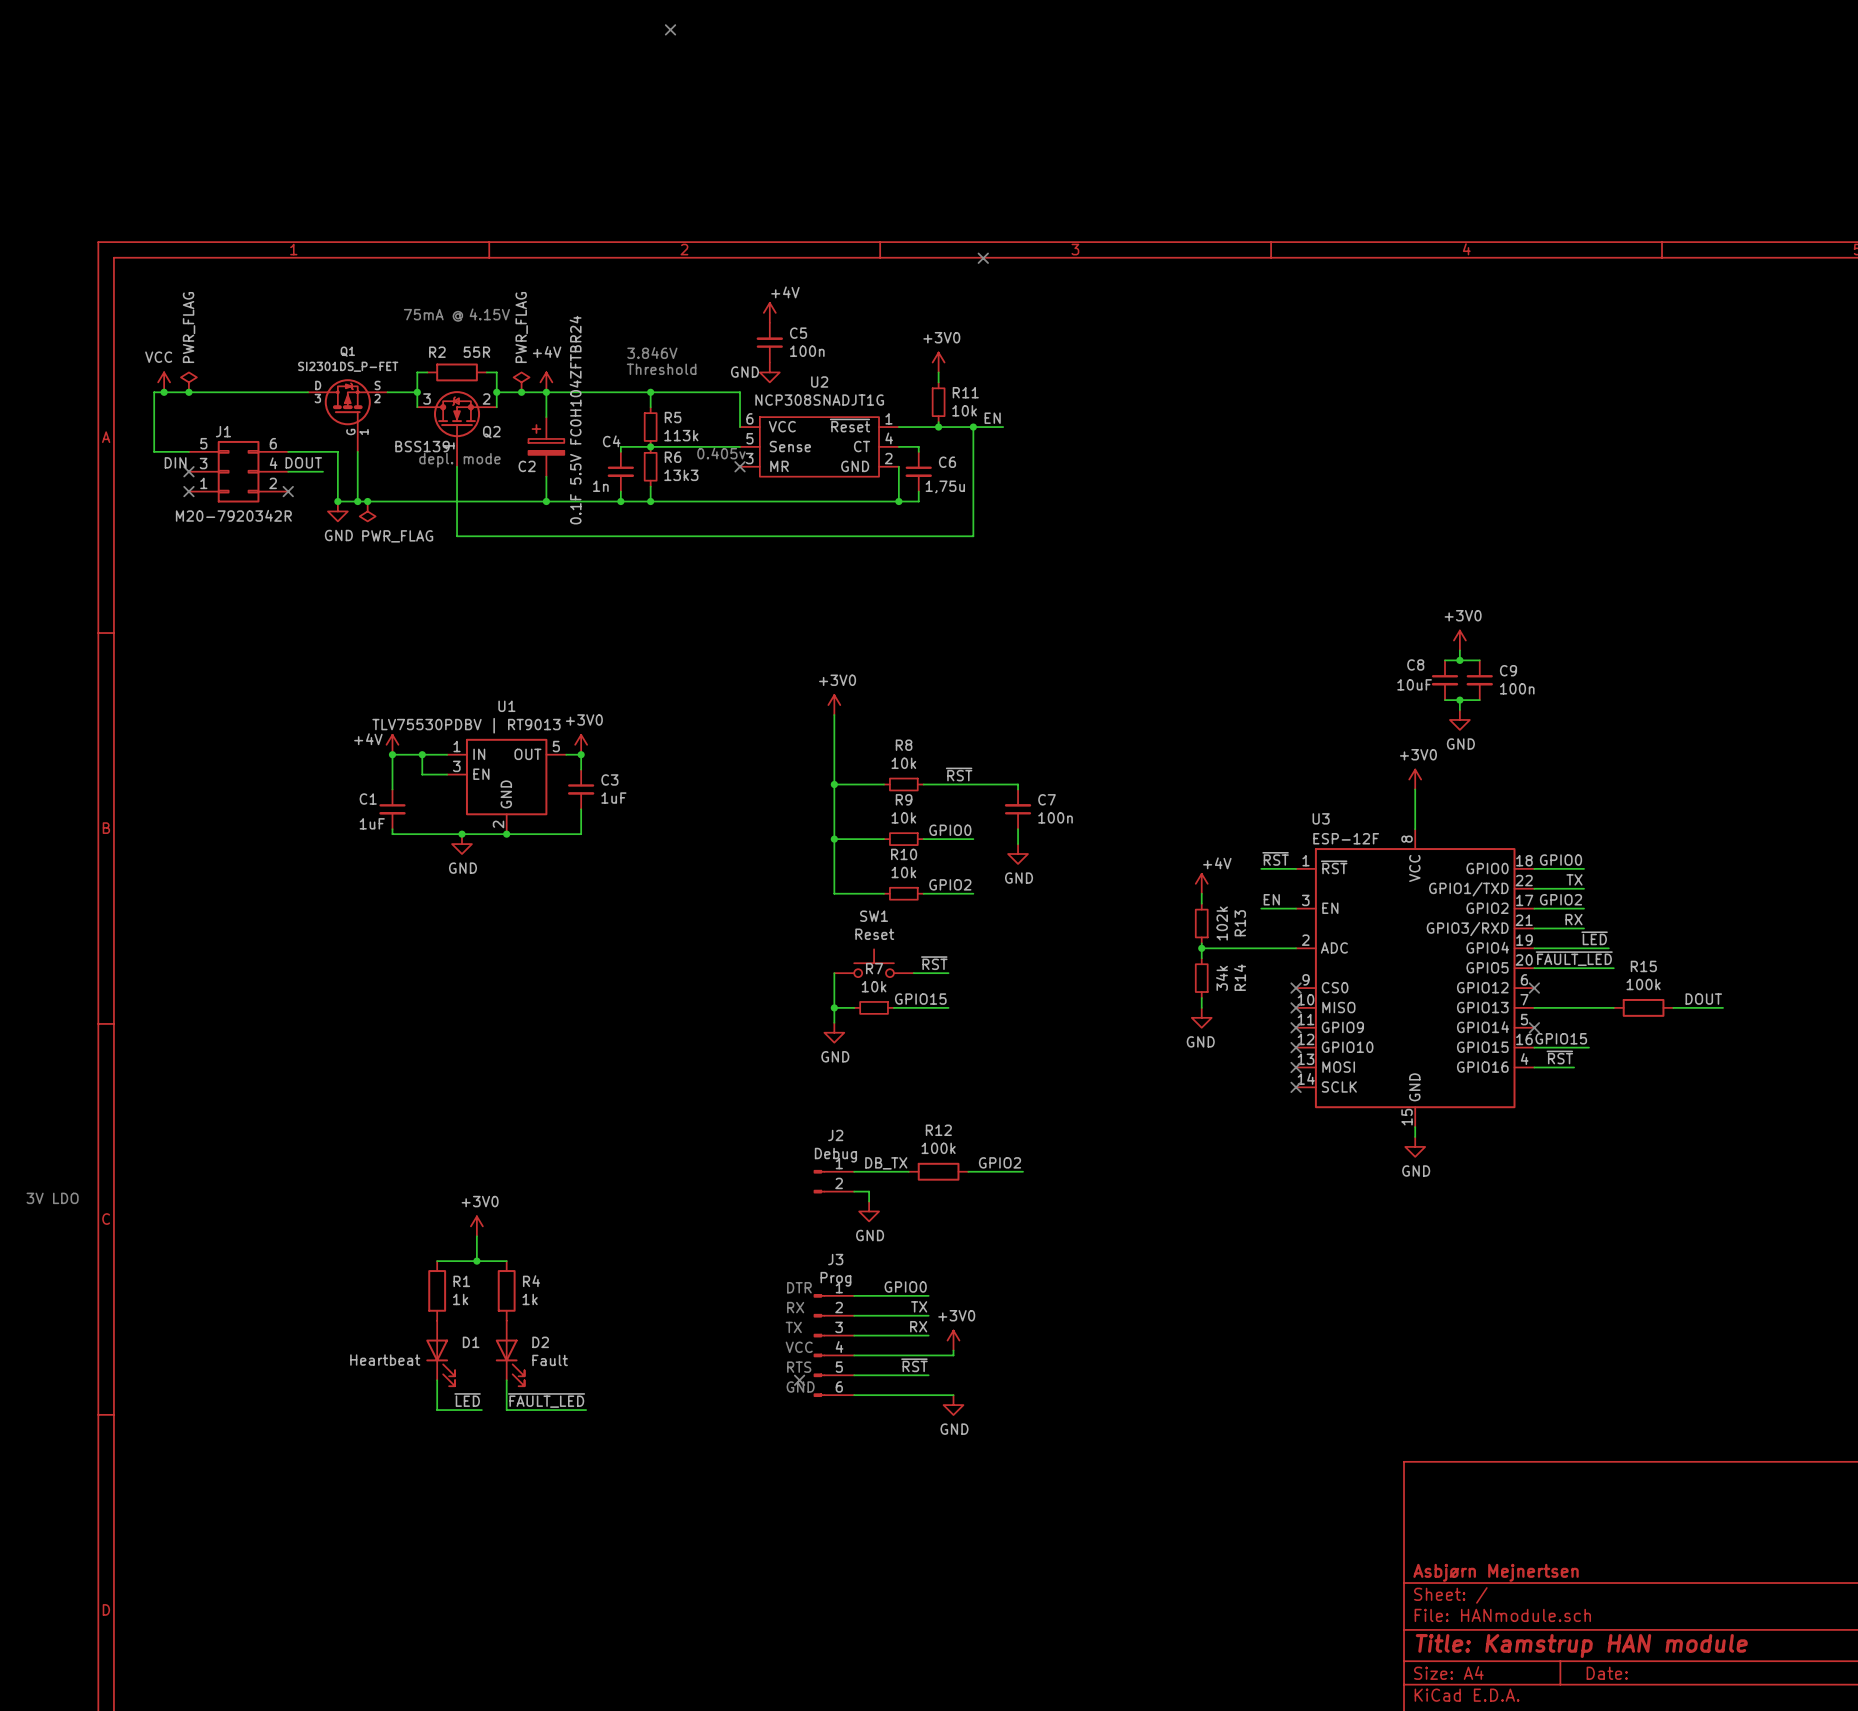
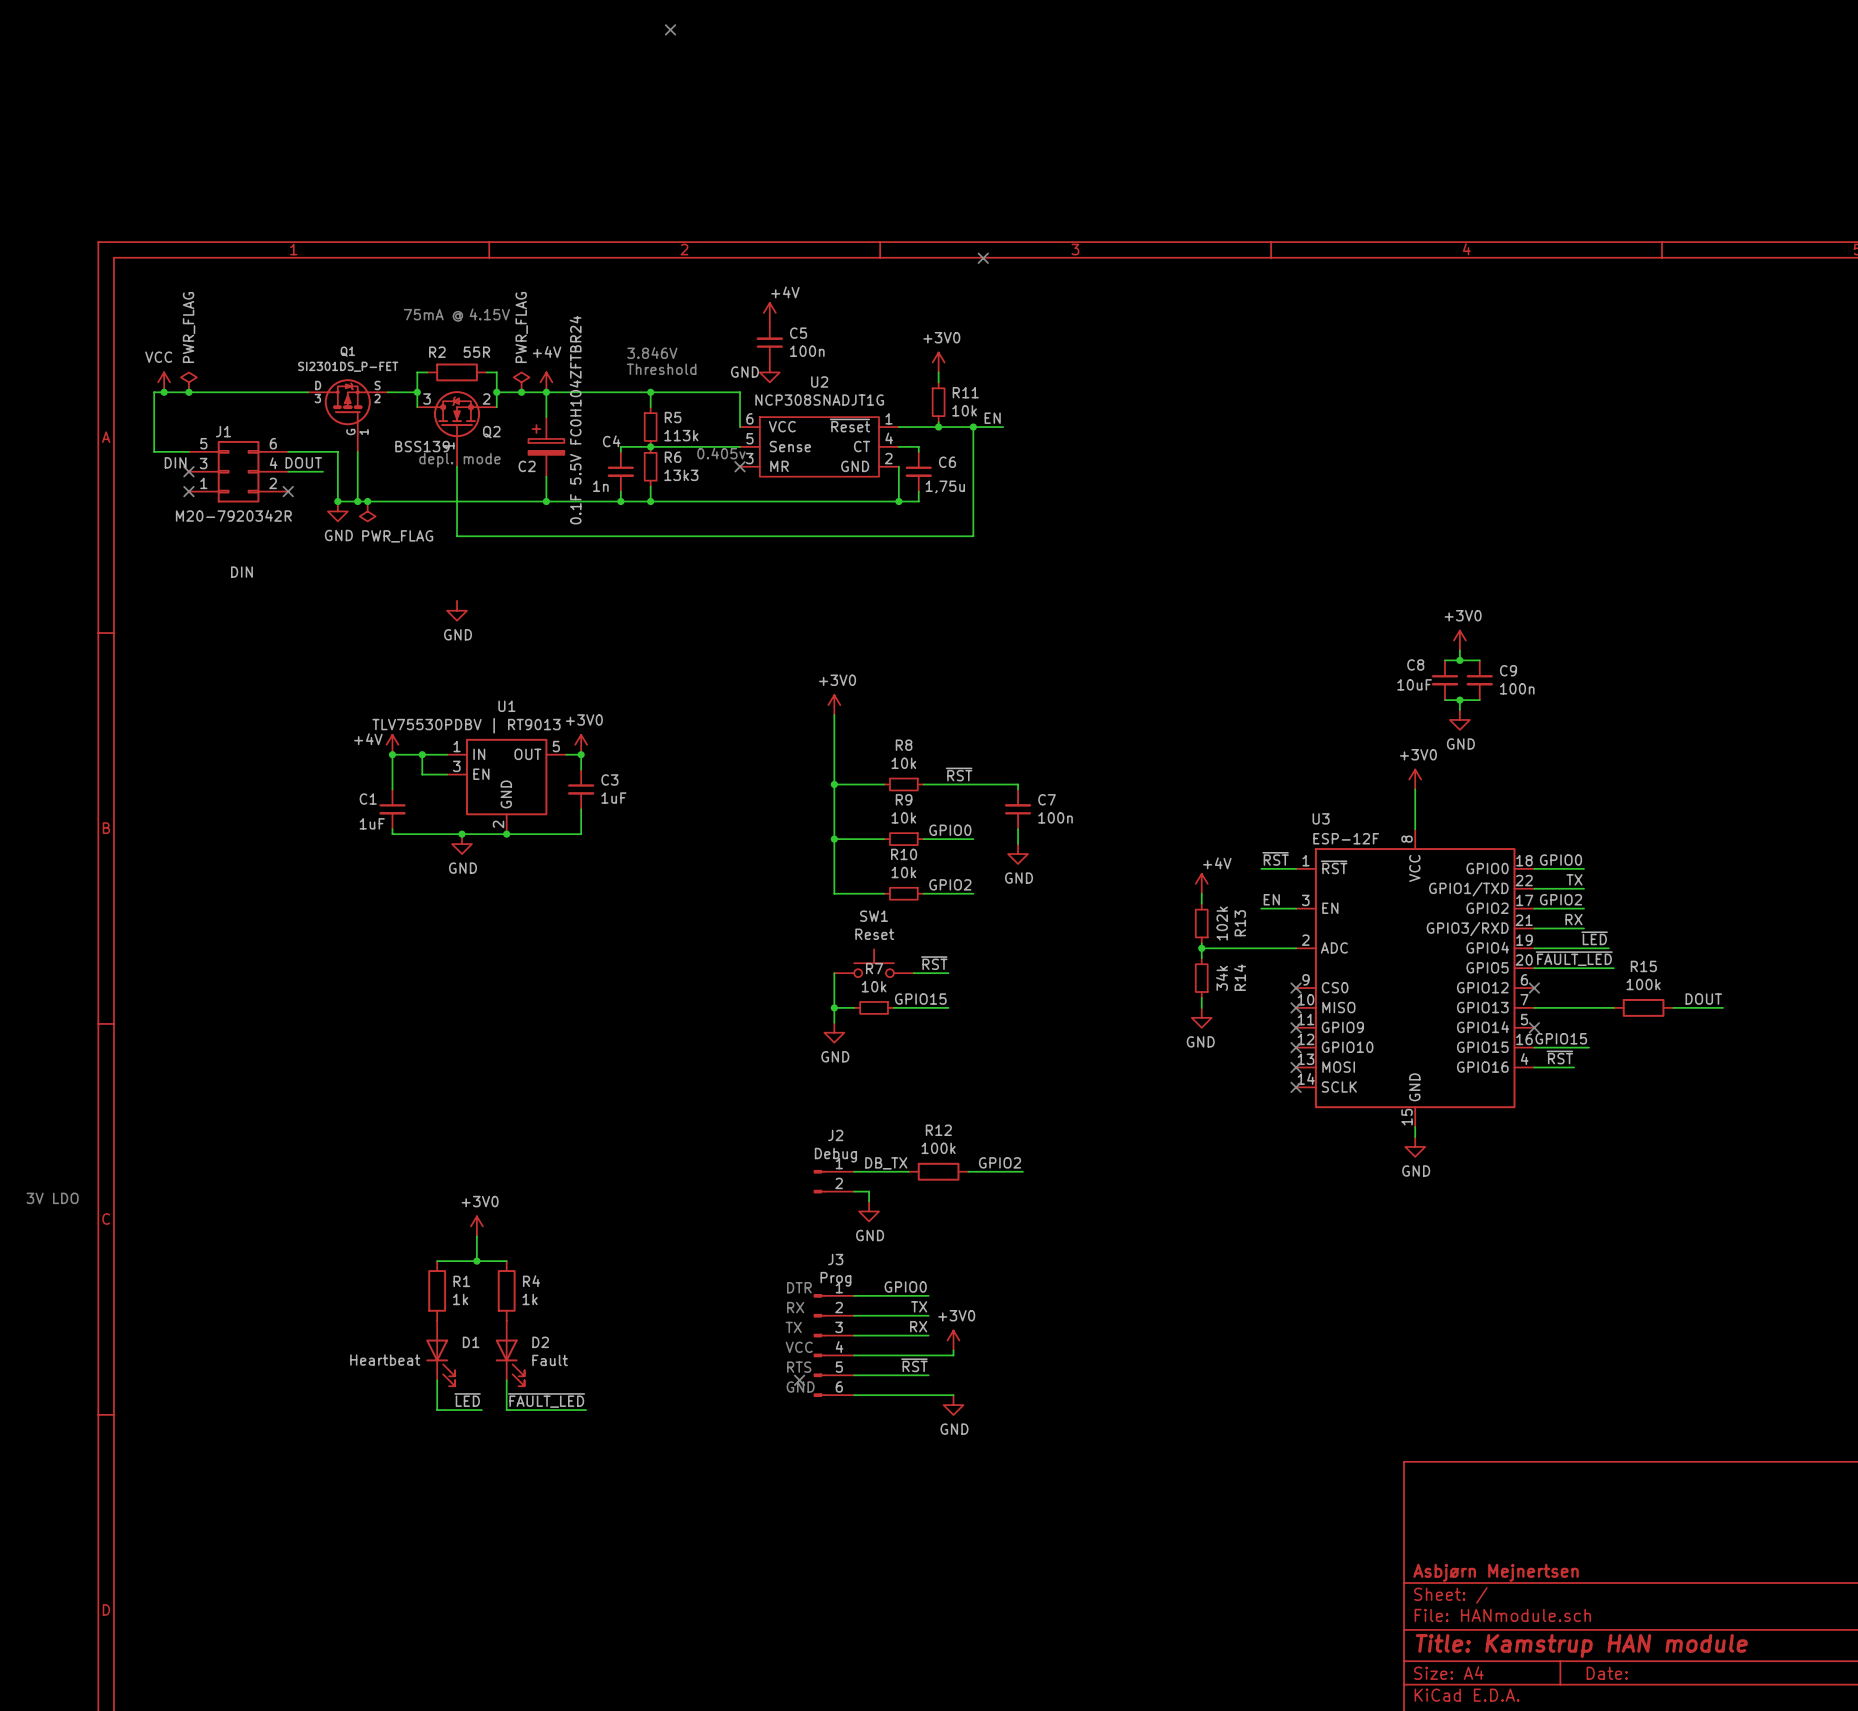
label: none -> DIN (241, 572)
power symbol: none -> GND (457, 610)

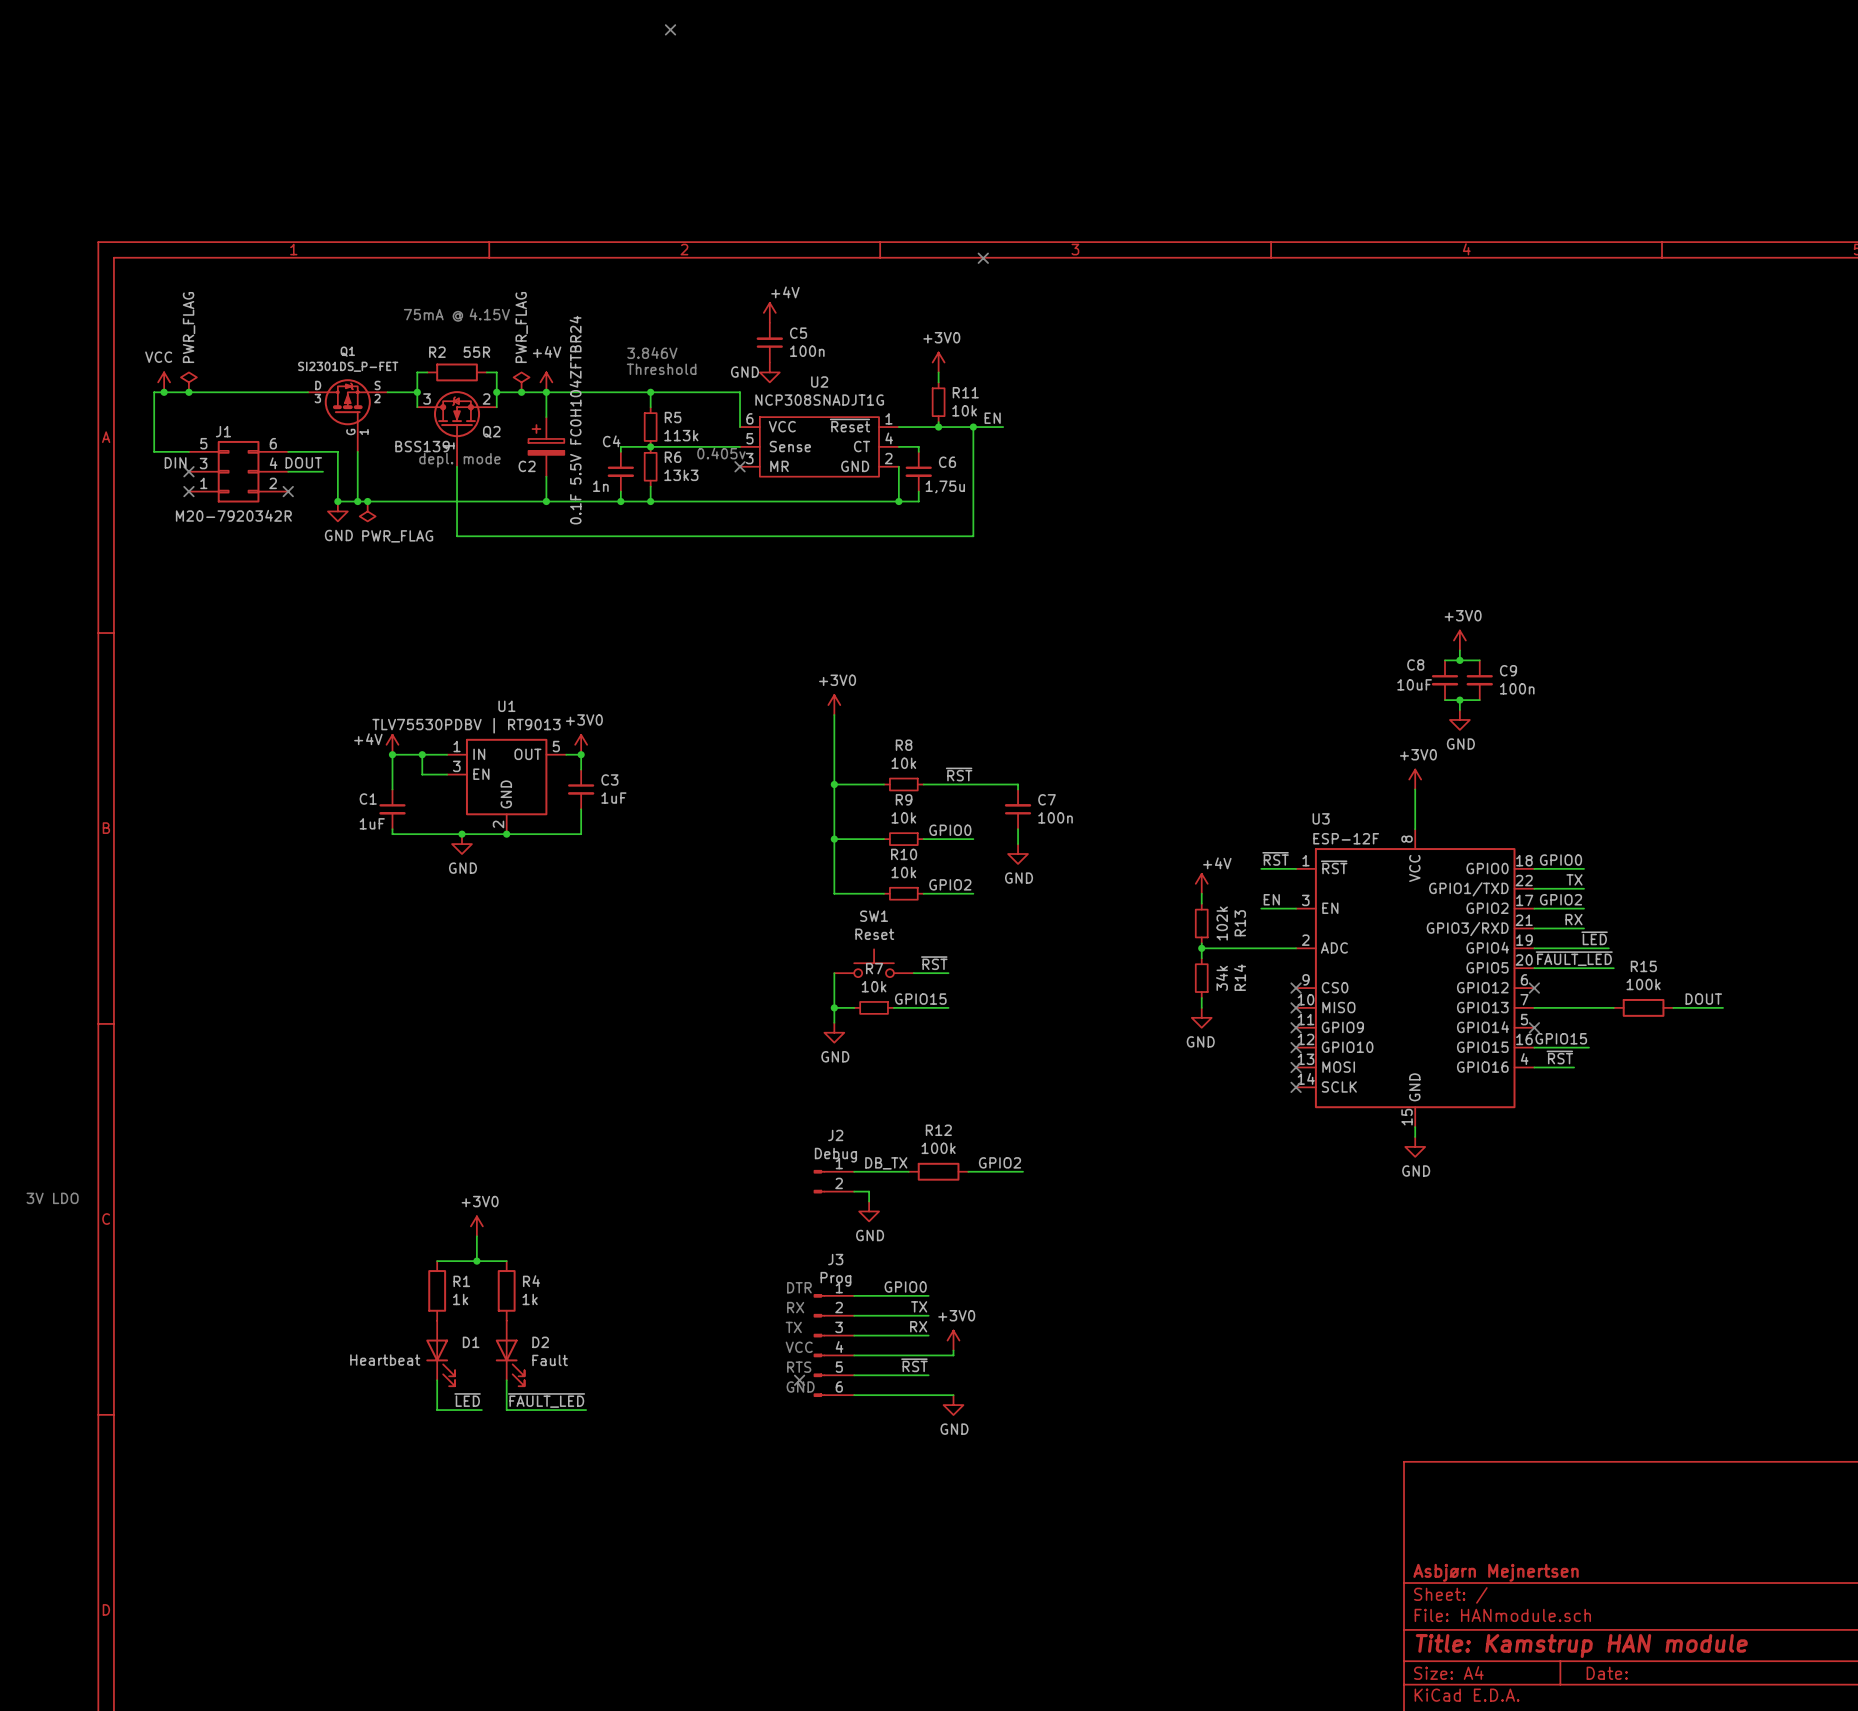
label: DIN (241, 572) -> none
power symbol: GND (457, 610) -> none

